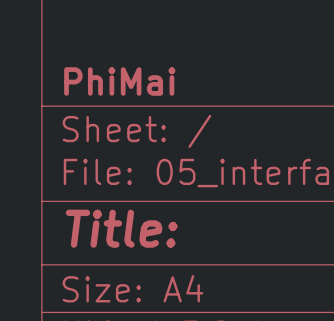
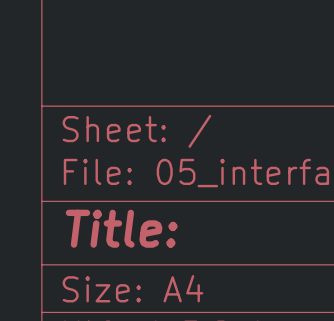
title block: PhiMai (119, 81) -> none

